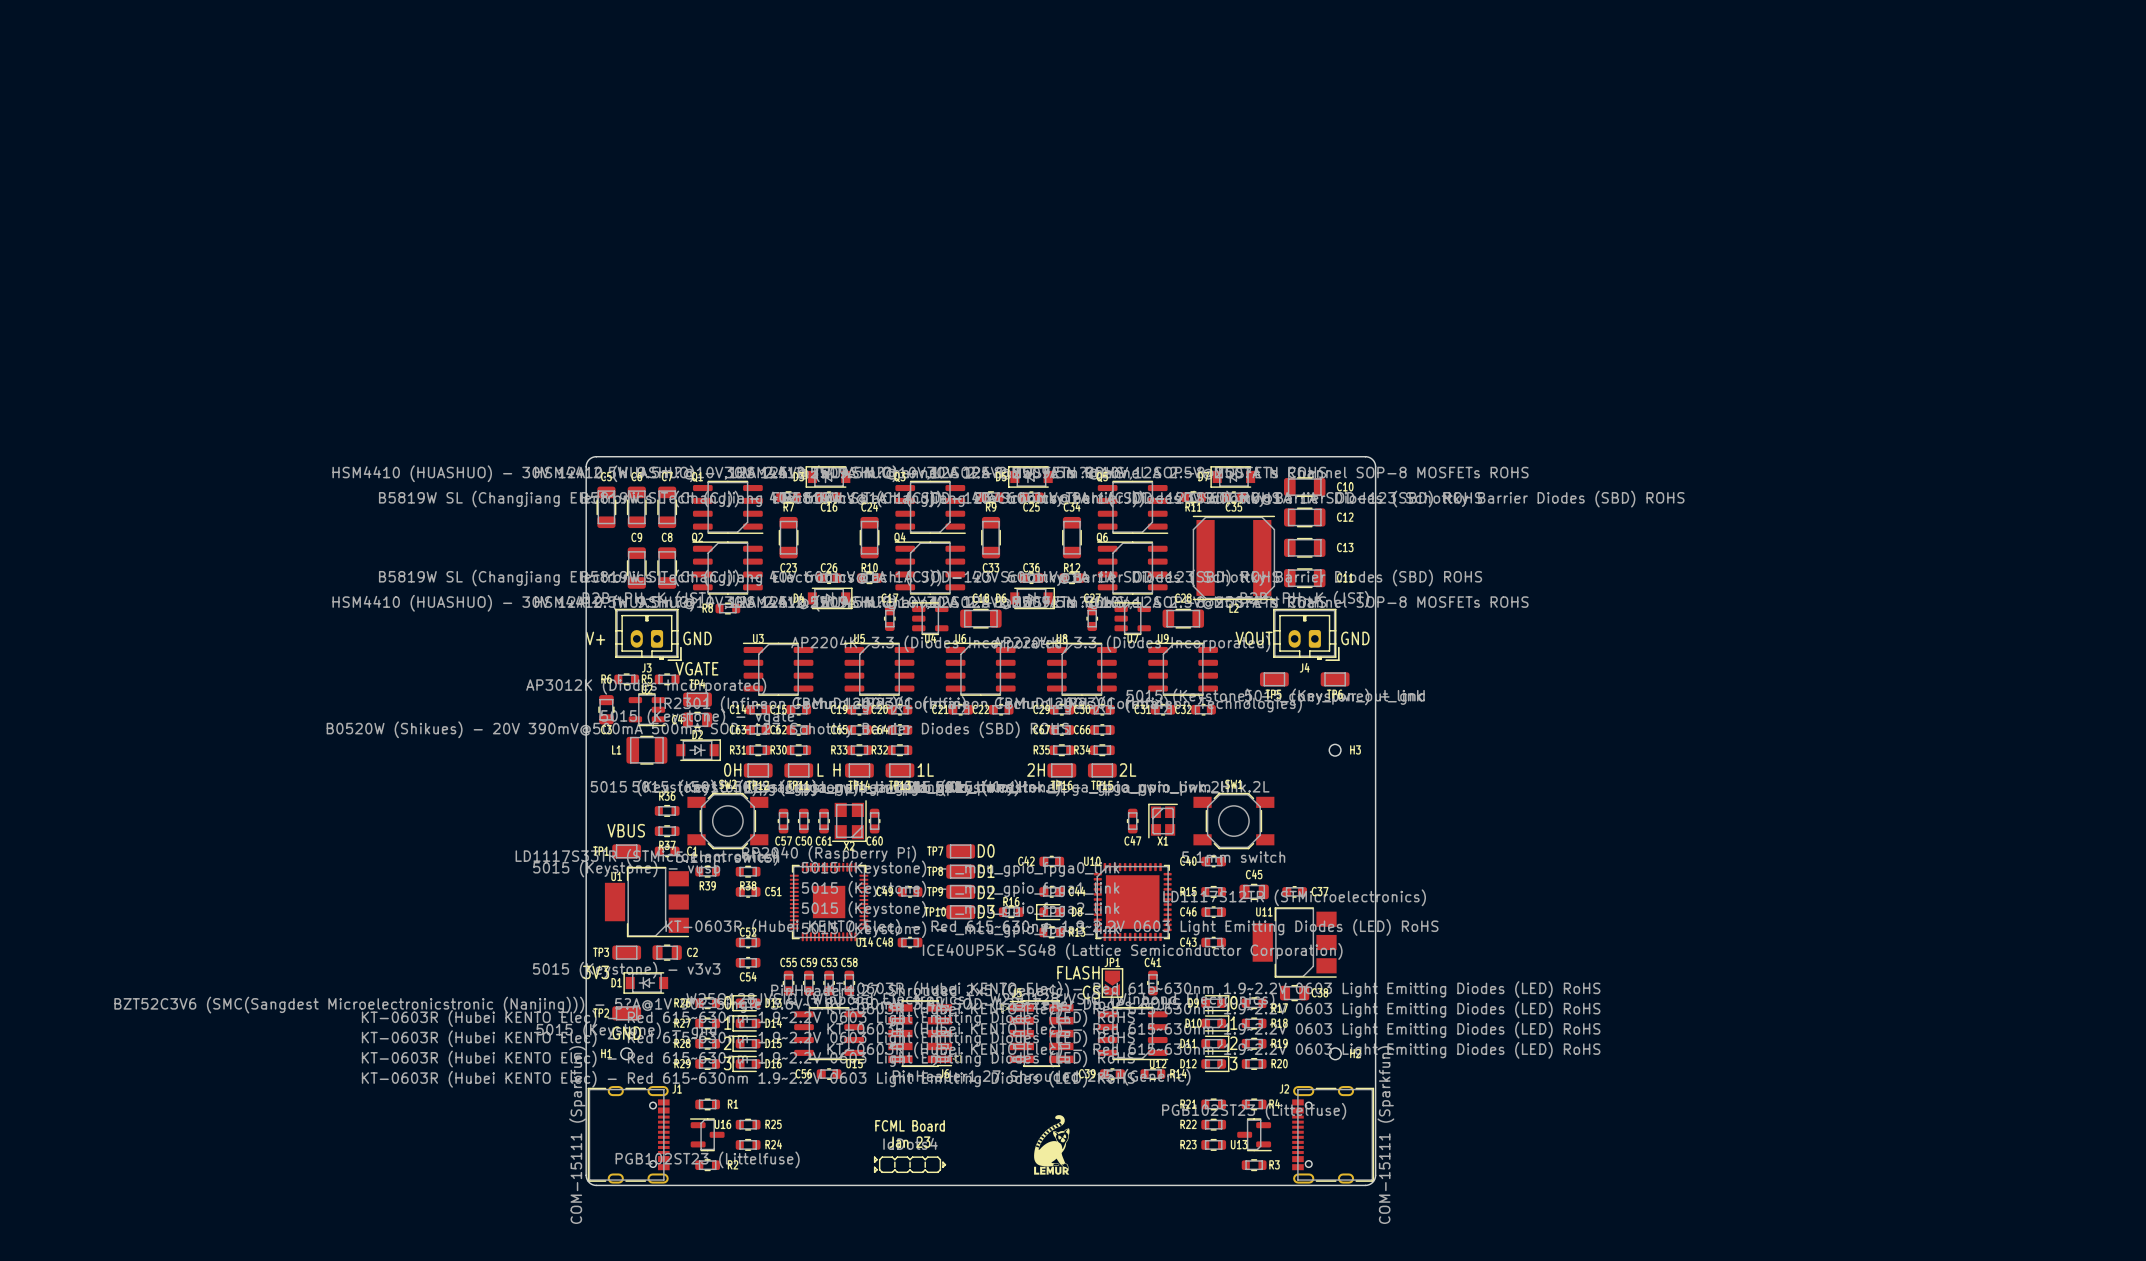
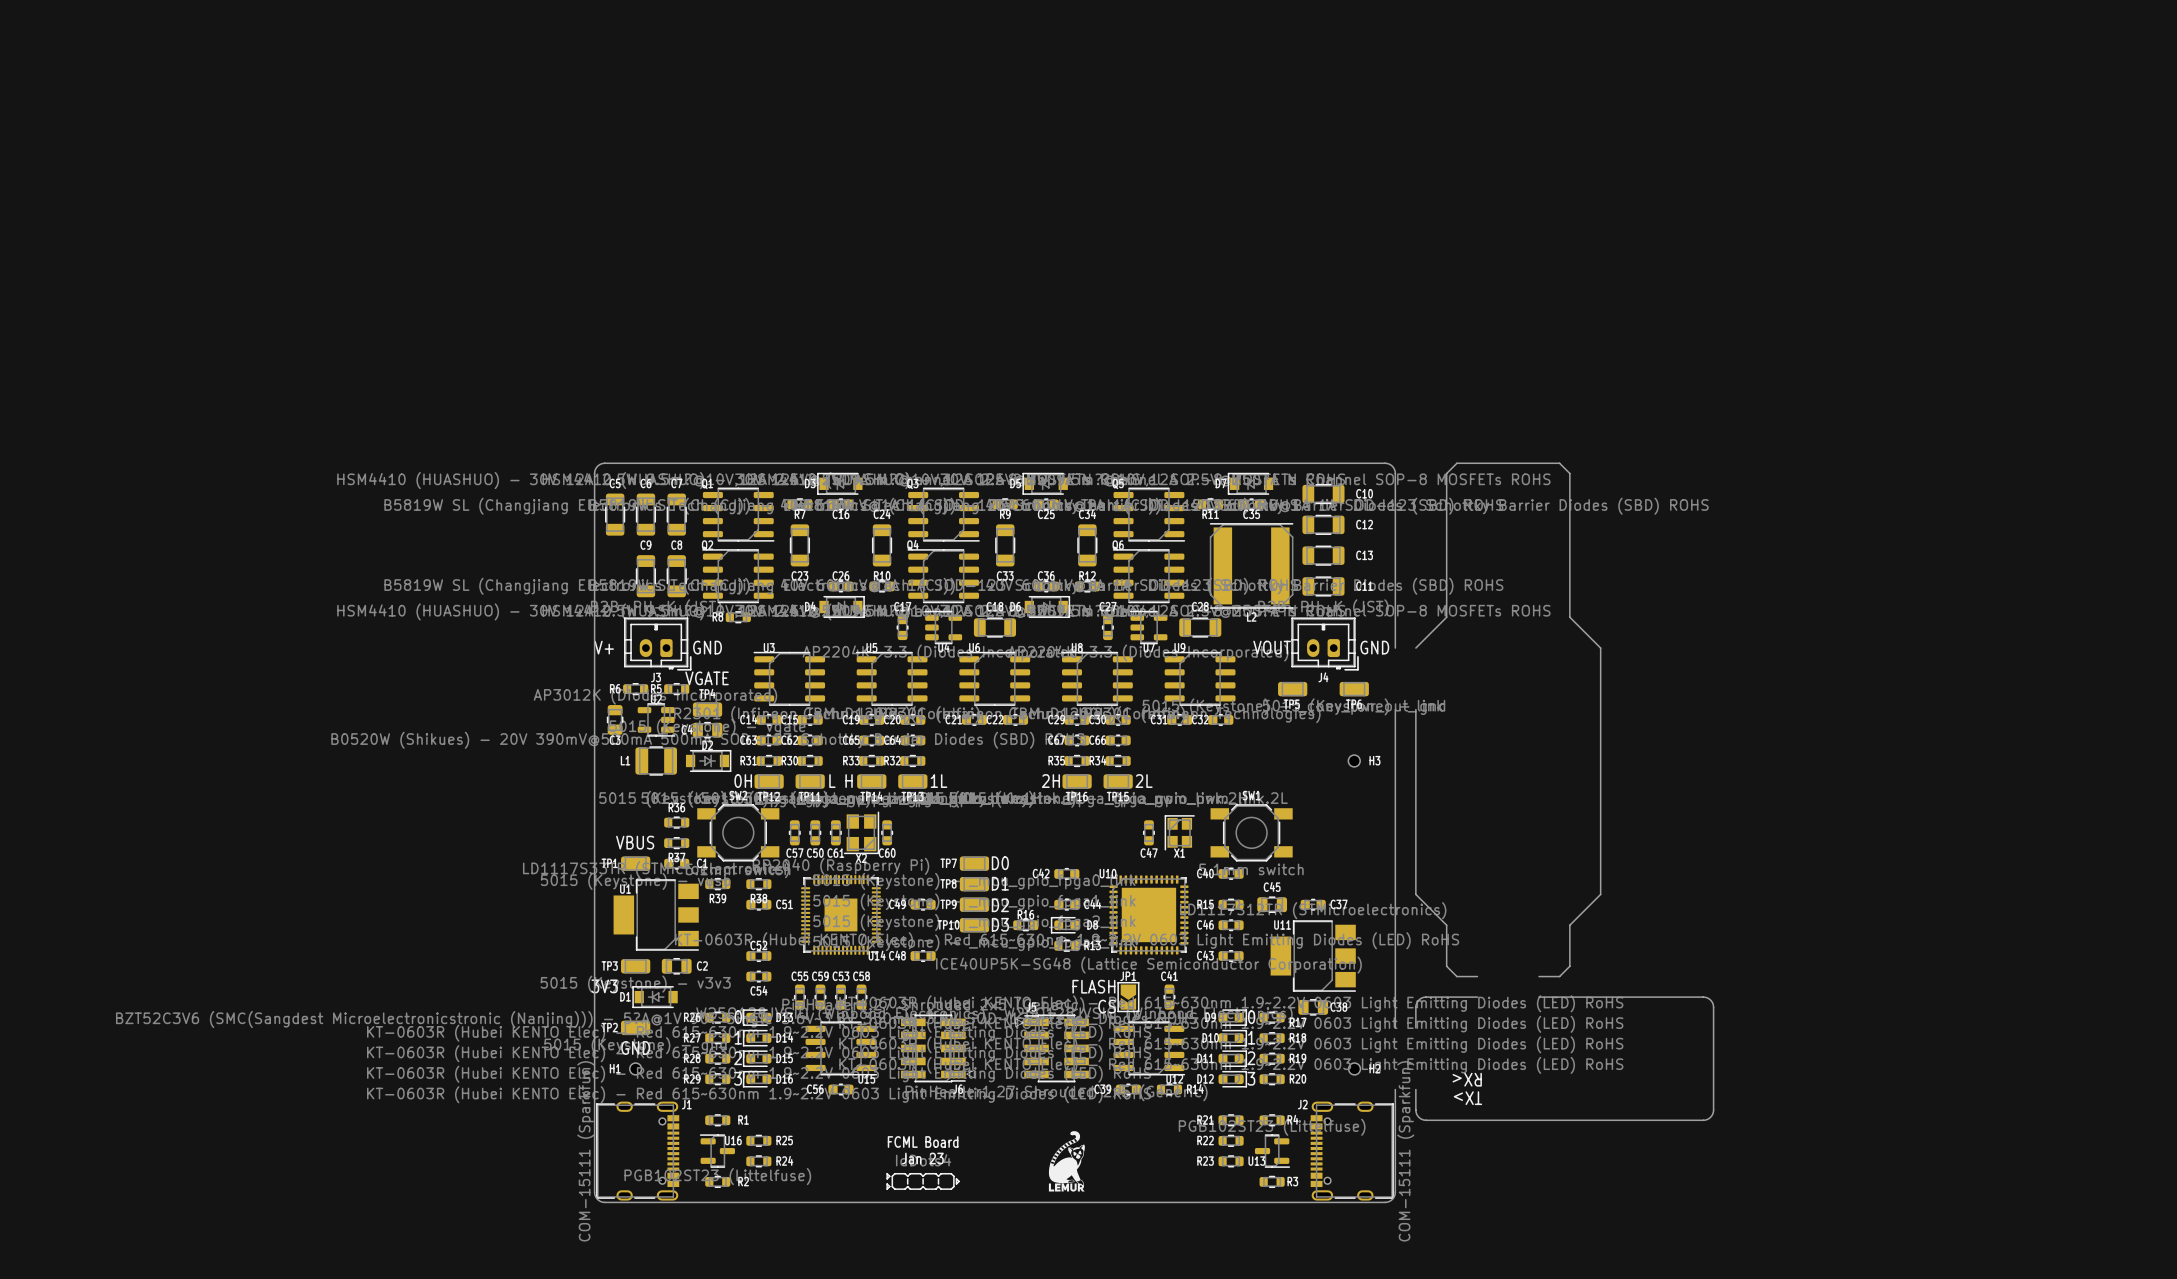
board edge: (1375, 638) (1375, 699) -> none
board edge: none -> (1415, 648) (1446, 617) (1446, 473) (1456, 463) (1559, 463) (1569, 473) (1569, 617) (1600, 648) (1600, 894) (1569, 925) (1569, 966) (1559, 976) (1539, 976)
board edge: none -> (1415, 709) (1415, 894) (1446, 925) (1446, 966) (1456, 976) (1477, 976)
board edge: none -> (1477, 997) (1421, 998) (1416, 1005) (1415, 1027)
board edge: none -> (1539, 997) (1703, 997) (1708, 998) (1713, 1007) (1712, 1115) (1703, 1120) (1424, 1120) (1419, 1118) (1416, 1113) (1415, 1089)
board edge: (1375, 1013) (1375, 1074) -> none
text: none -> RX< (1467, 1079)
text: none -> TX> (1467, 1098)

